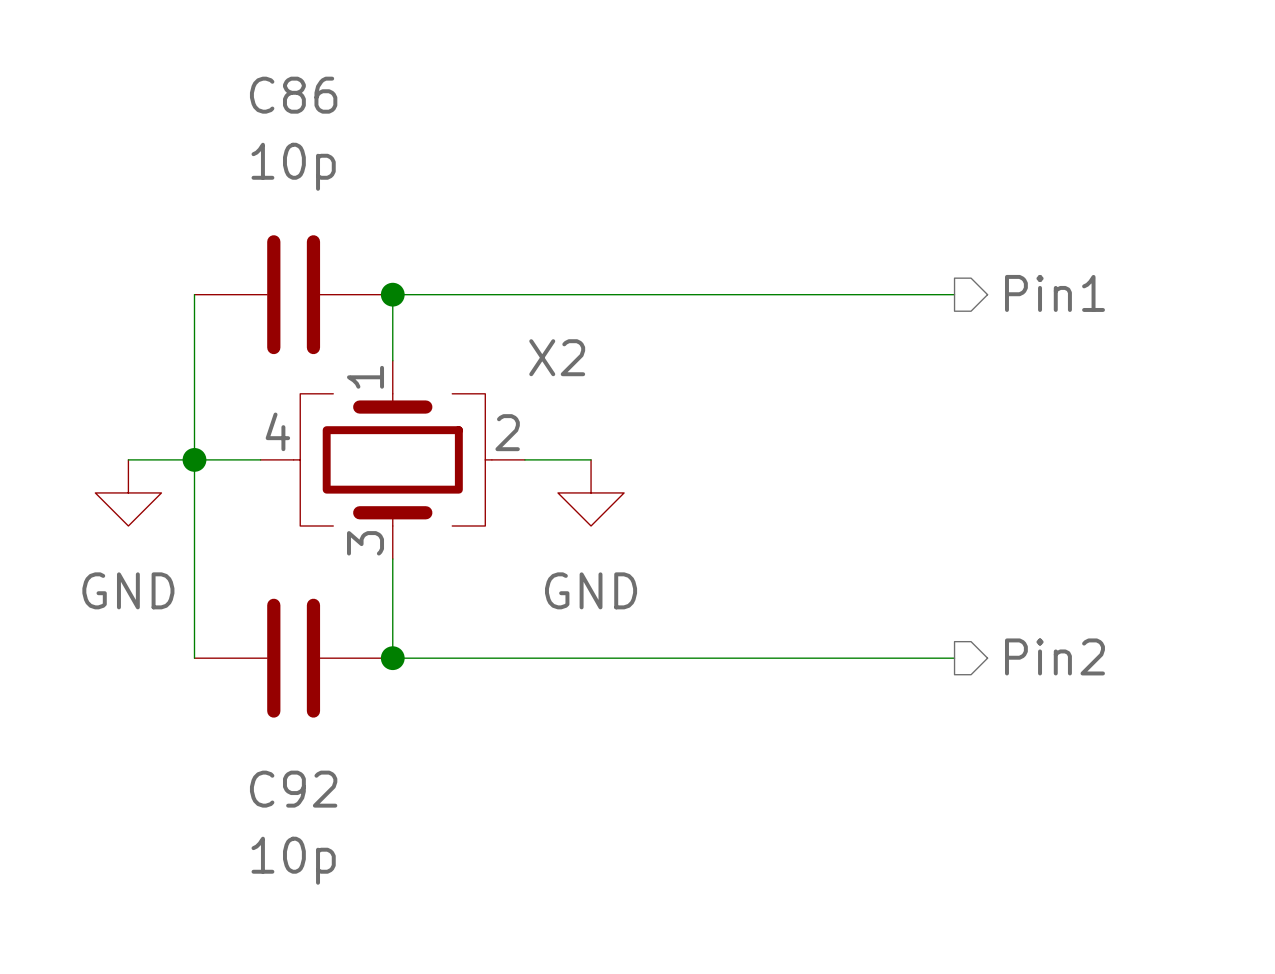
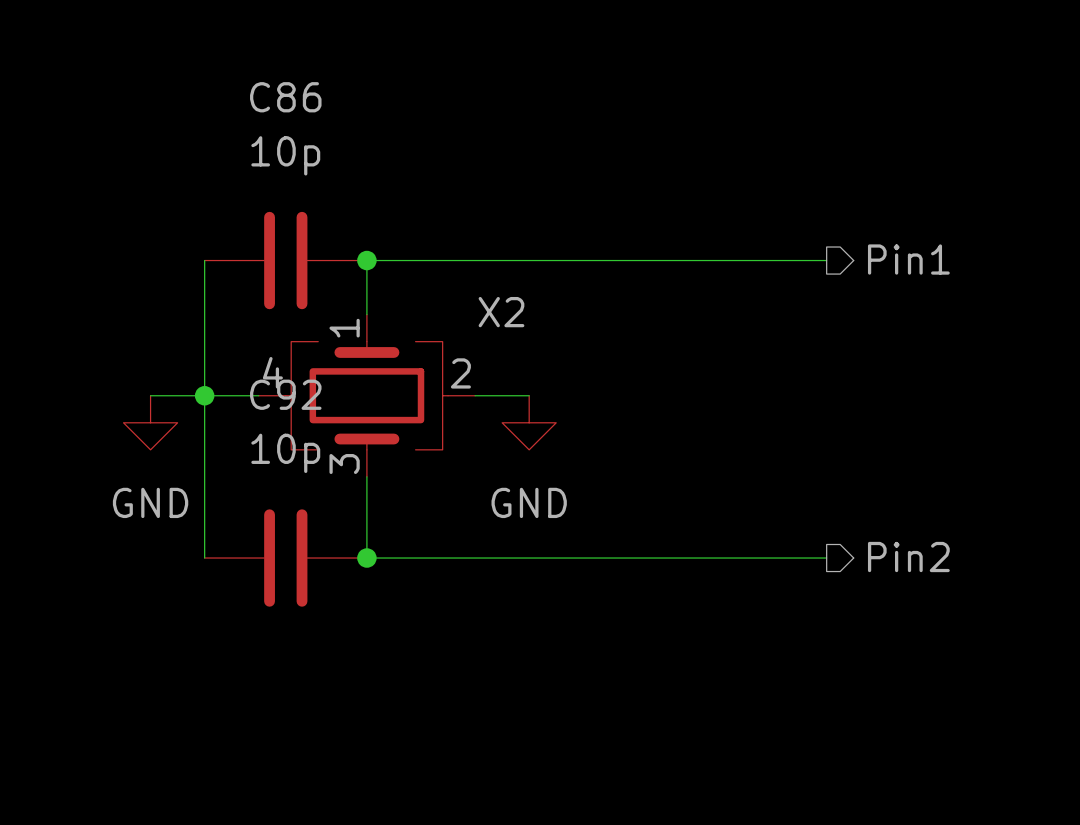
C92 name position: C92 (293, 789) -> C92 (285, 394)
C92 value position: 10p (293, 860) -> 10p (285, 453)

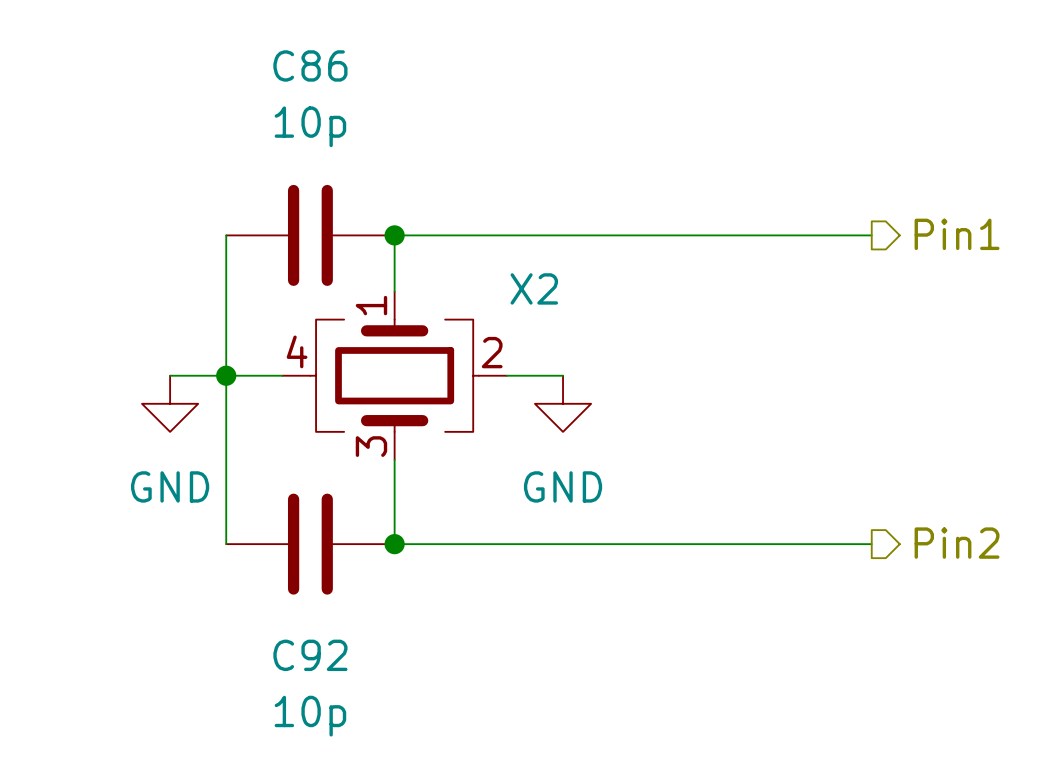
C92 name position: C92 (285, 394) -> C92 (310, 655)
C92 value position: 10p (285, 453) -> 10p (310, 716)

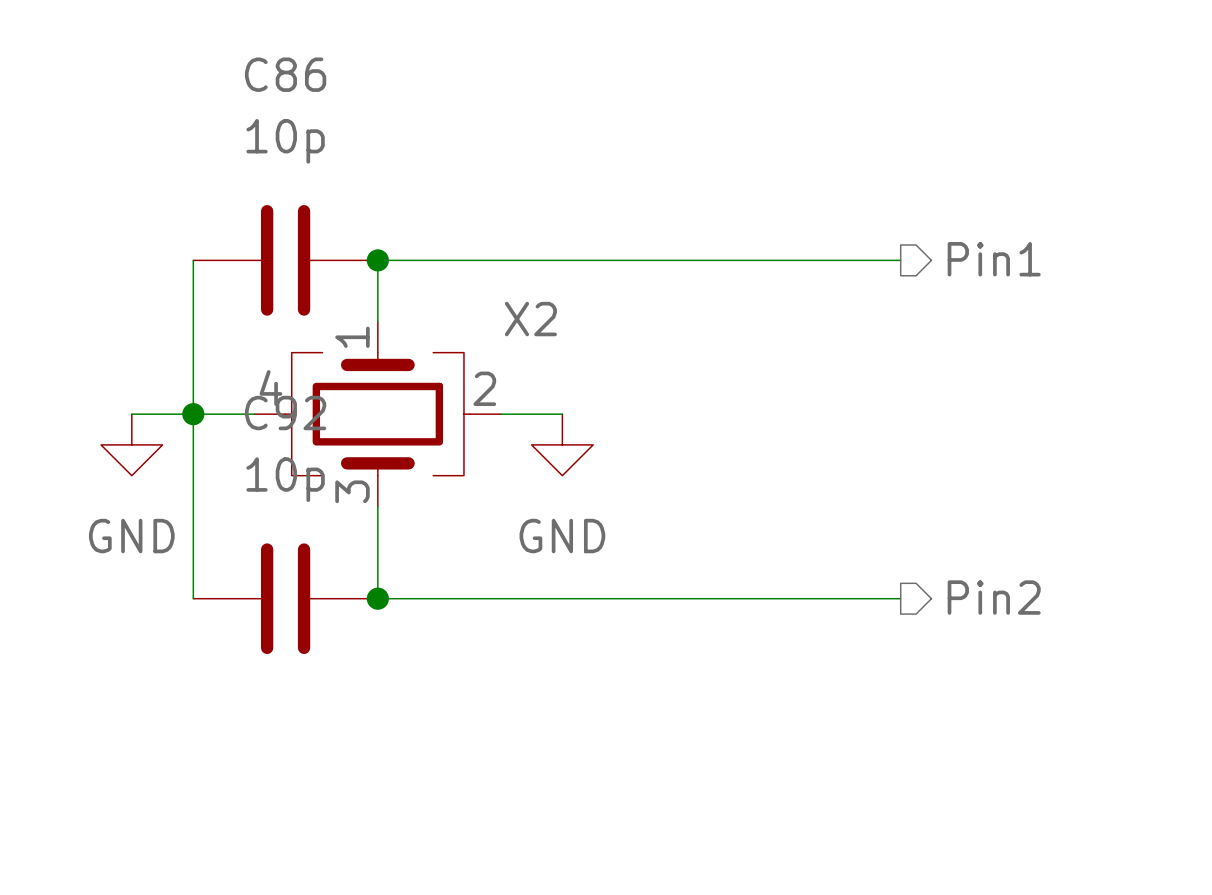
C92 name position: C92 (310, 655) -> C92 (285, 413)
C92 value position: 10p (310, 716) -> 10p (285, 479)

